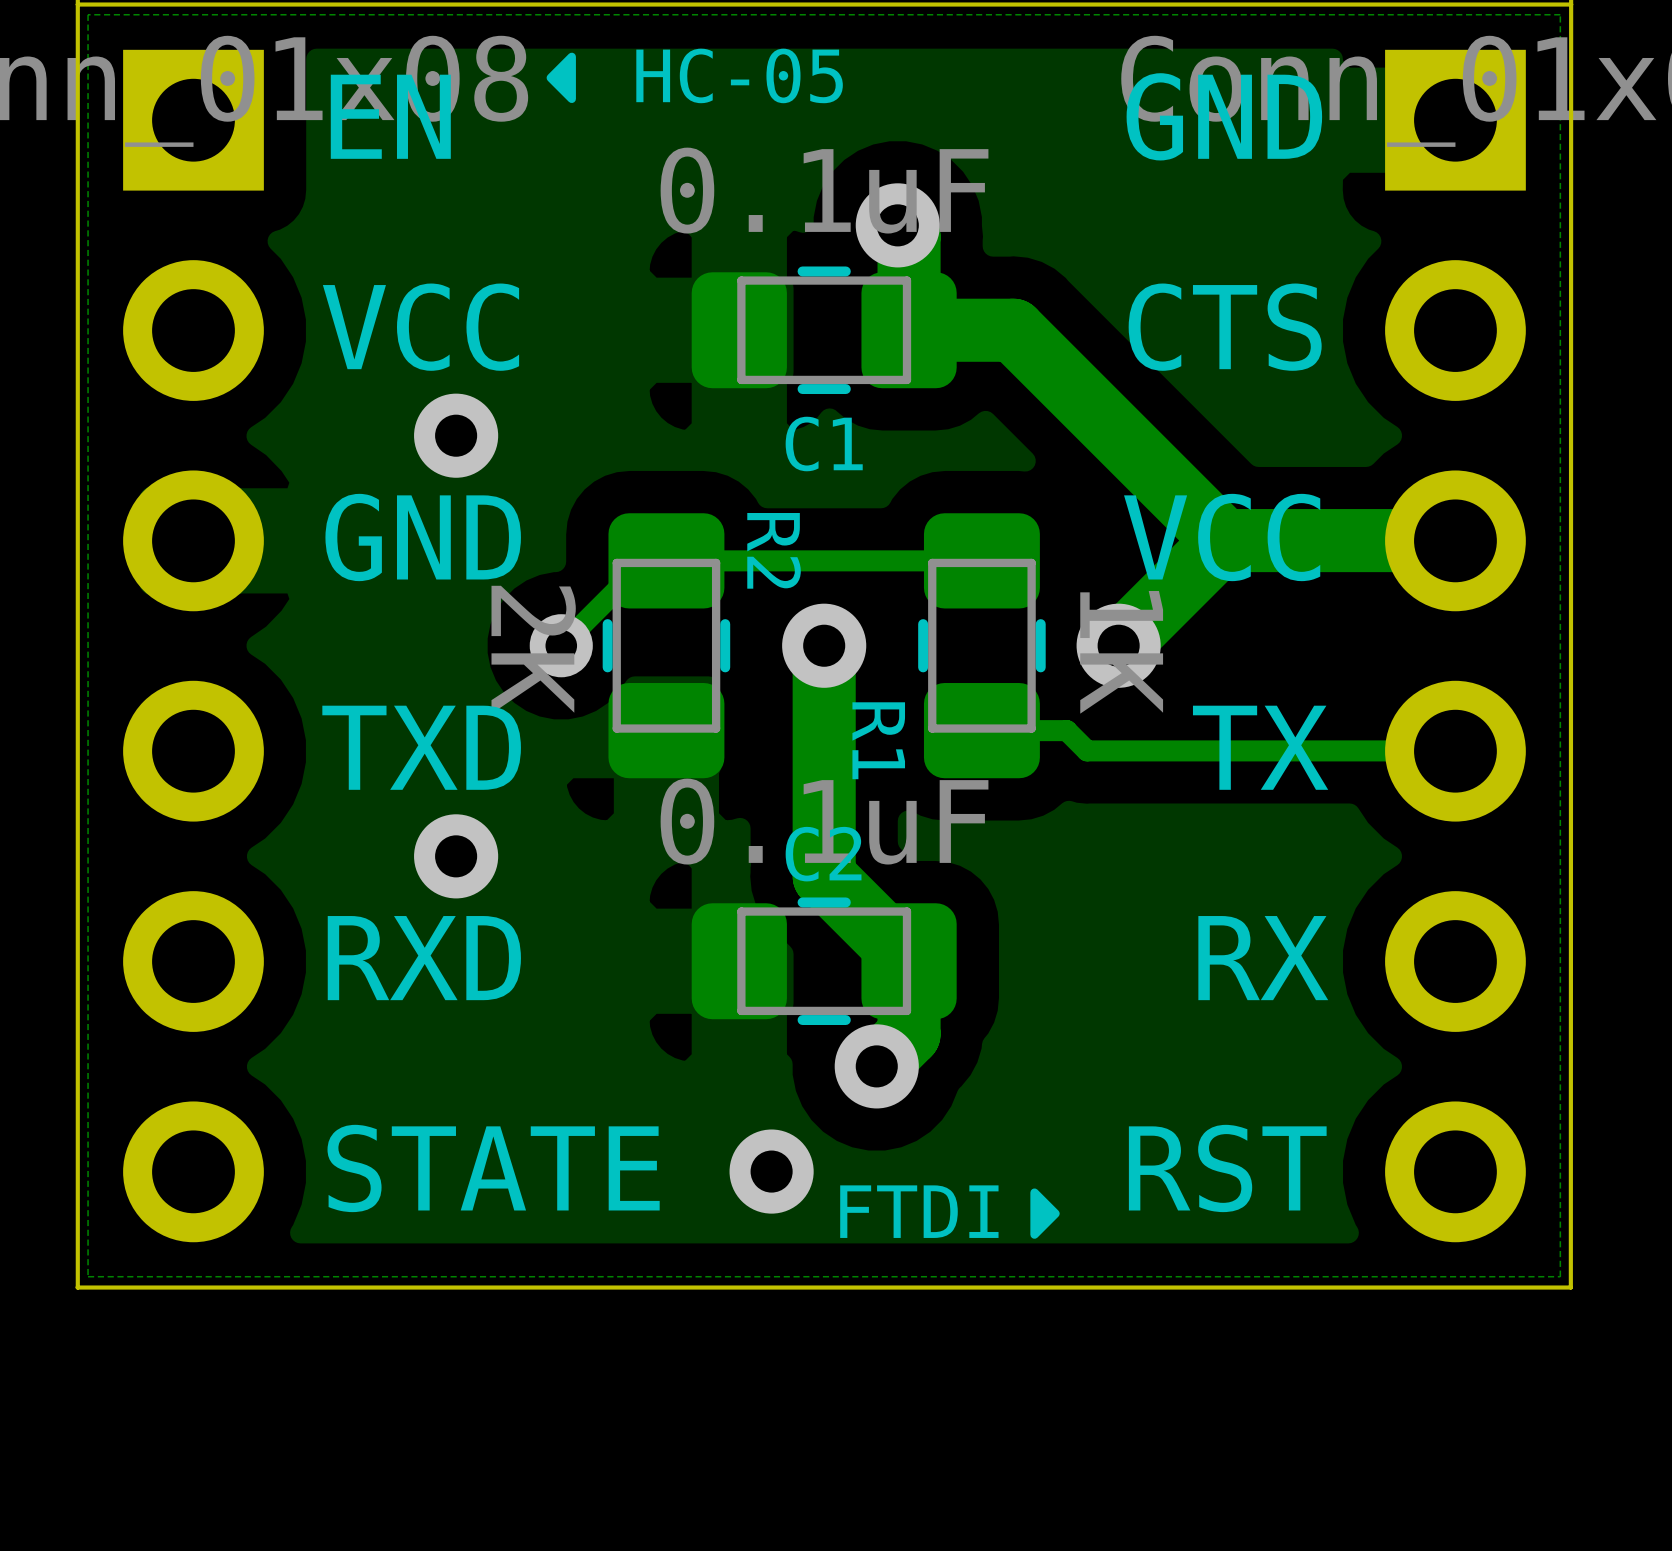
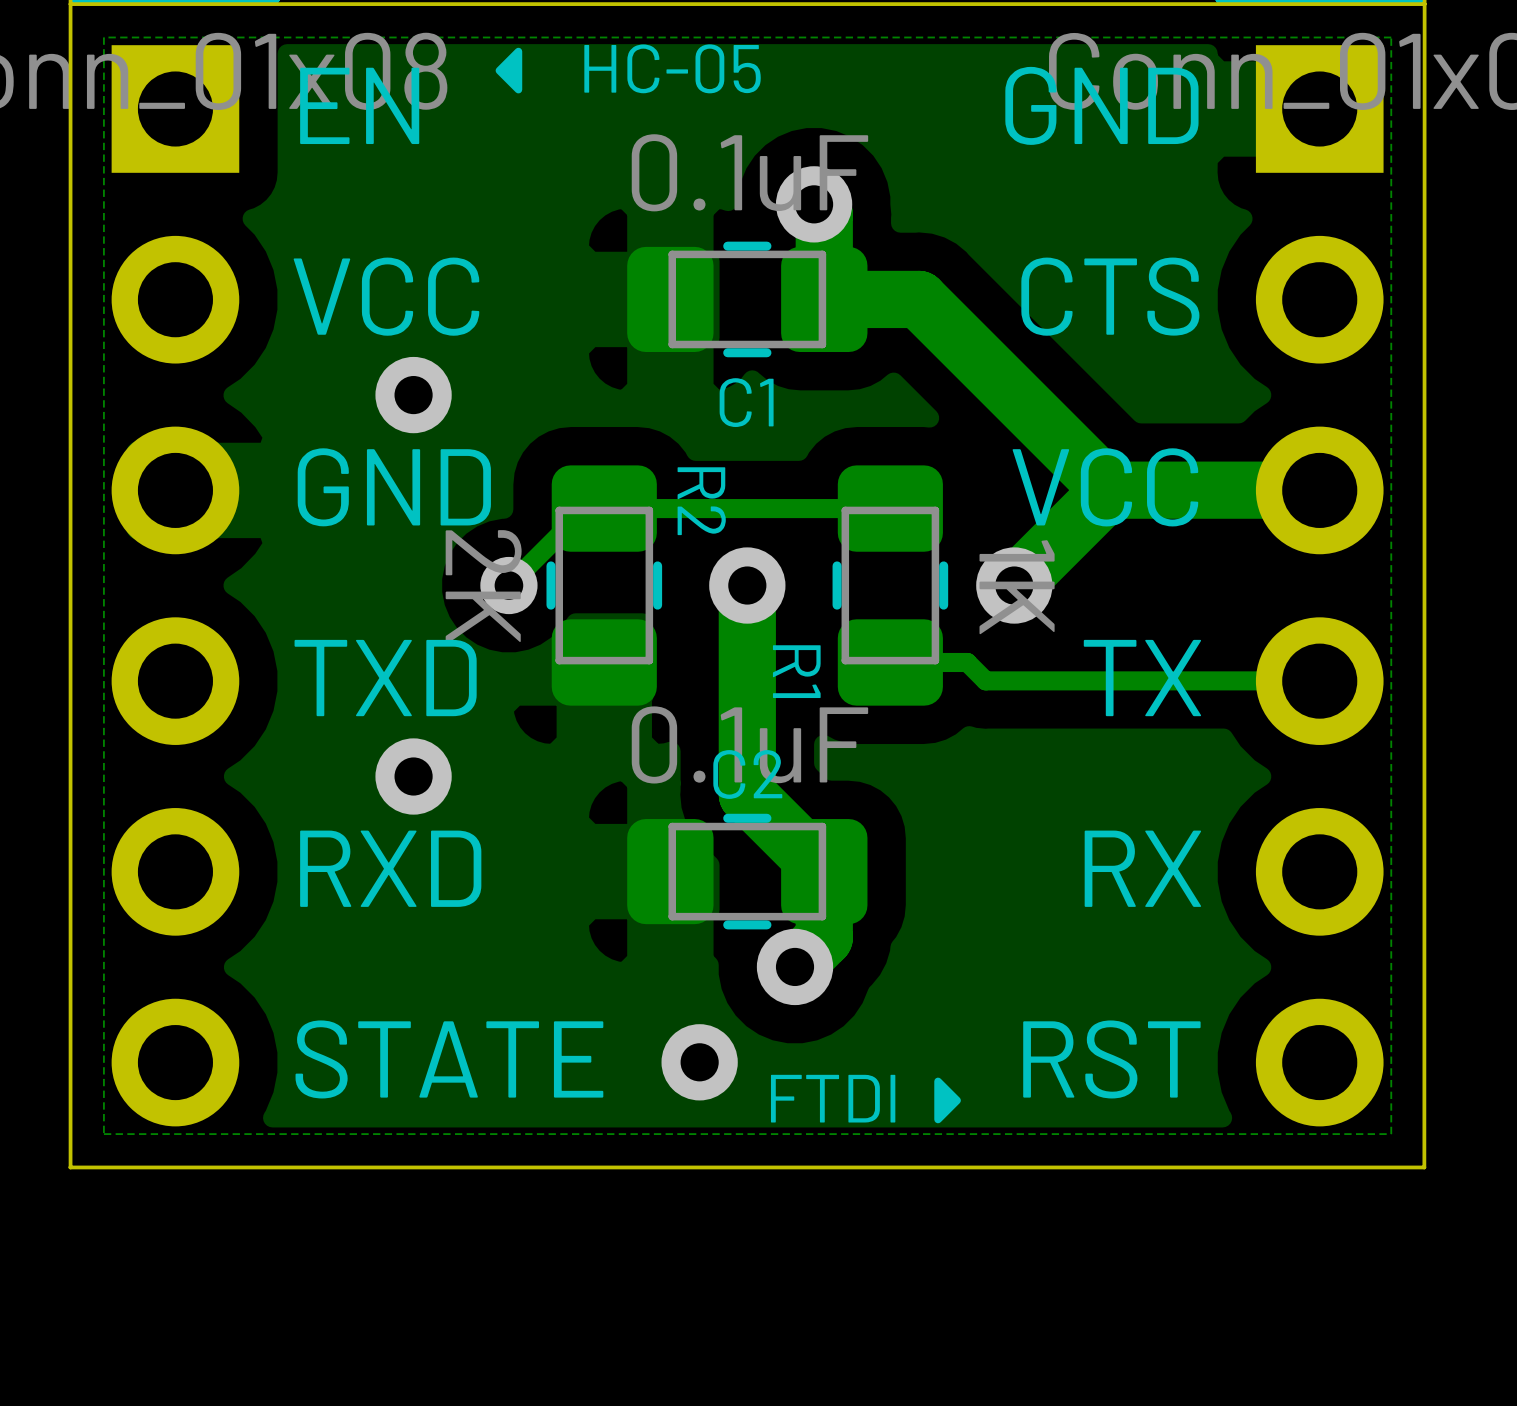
zone outline: (1560, 14) (1560, 1276) (88, 1276) (88, 14) (1560, 14) -> (1391, 37) (1391, 1134) (103, 1134) (103, 37) (1391, 37)

